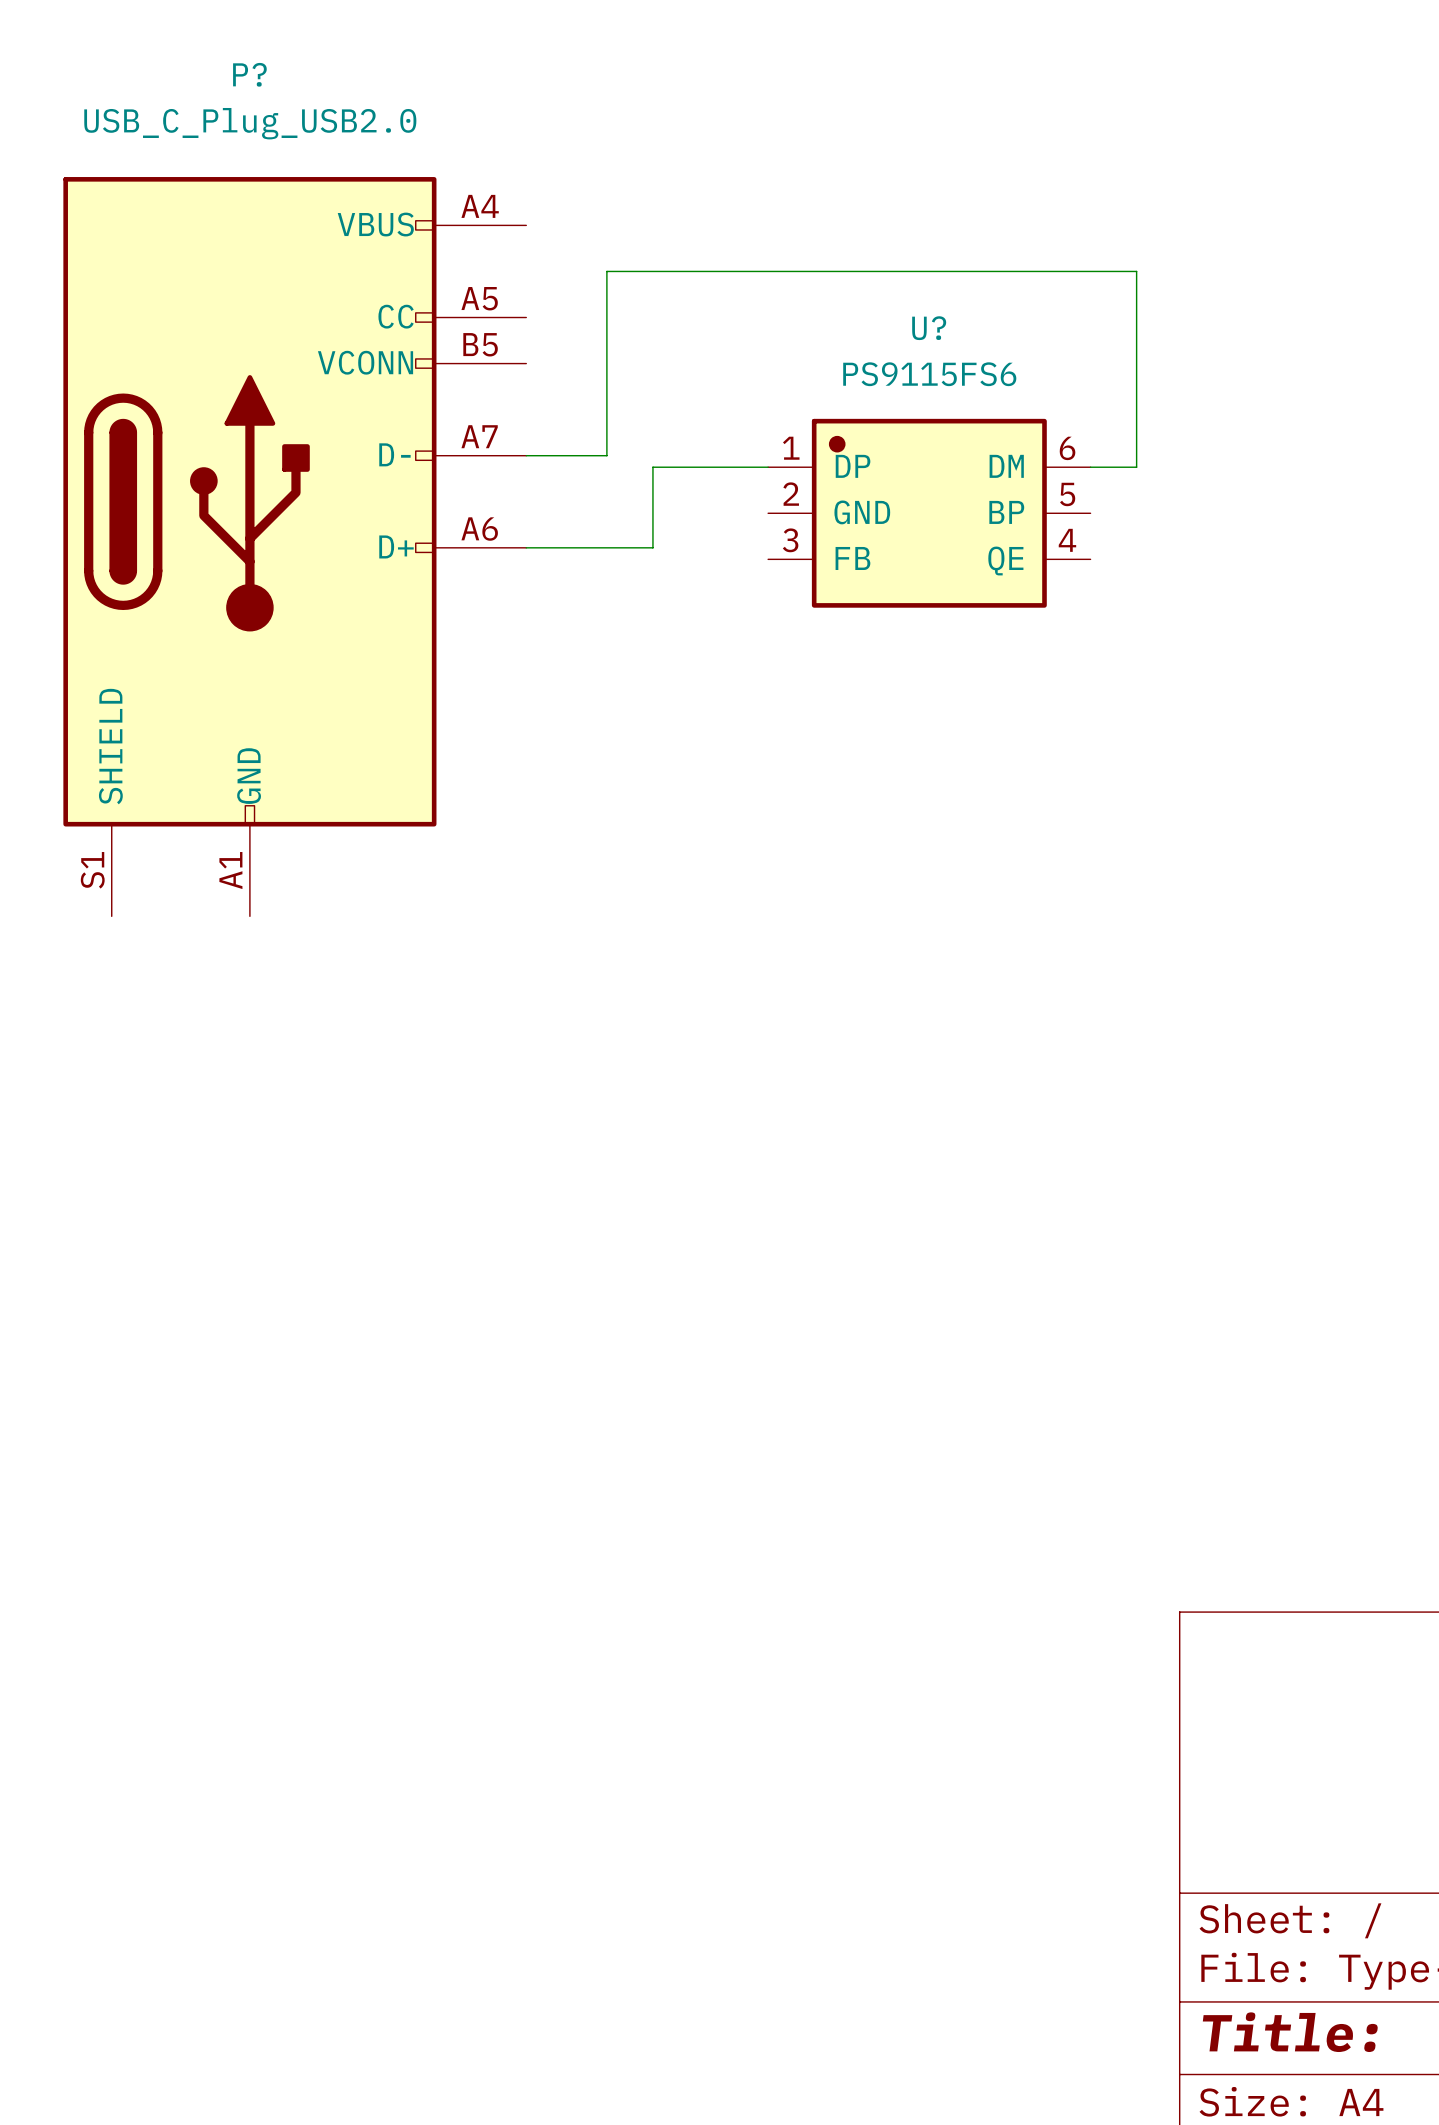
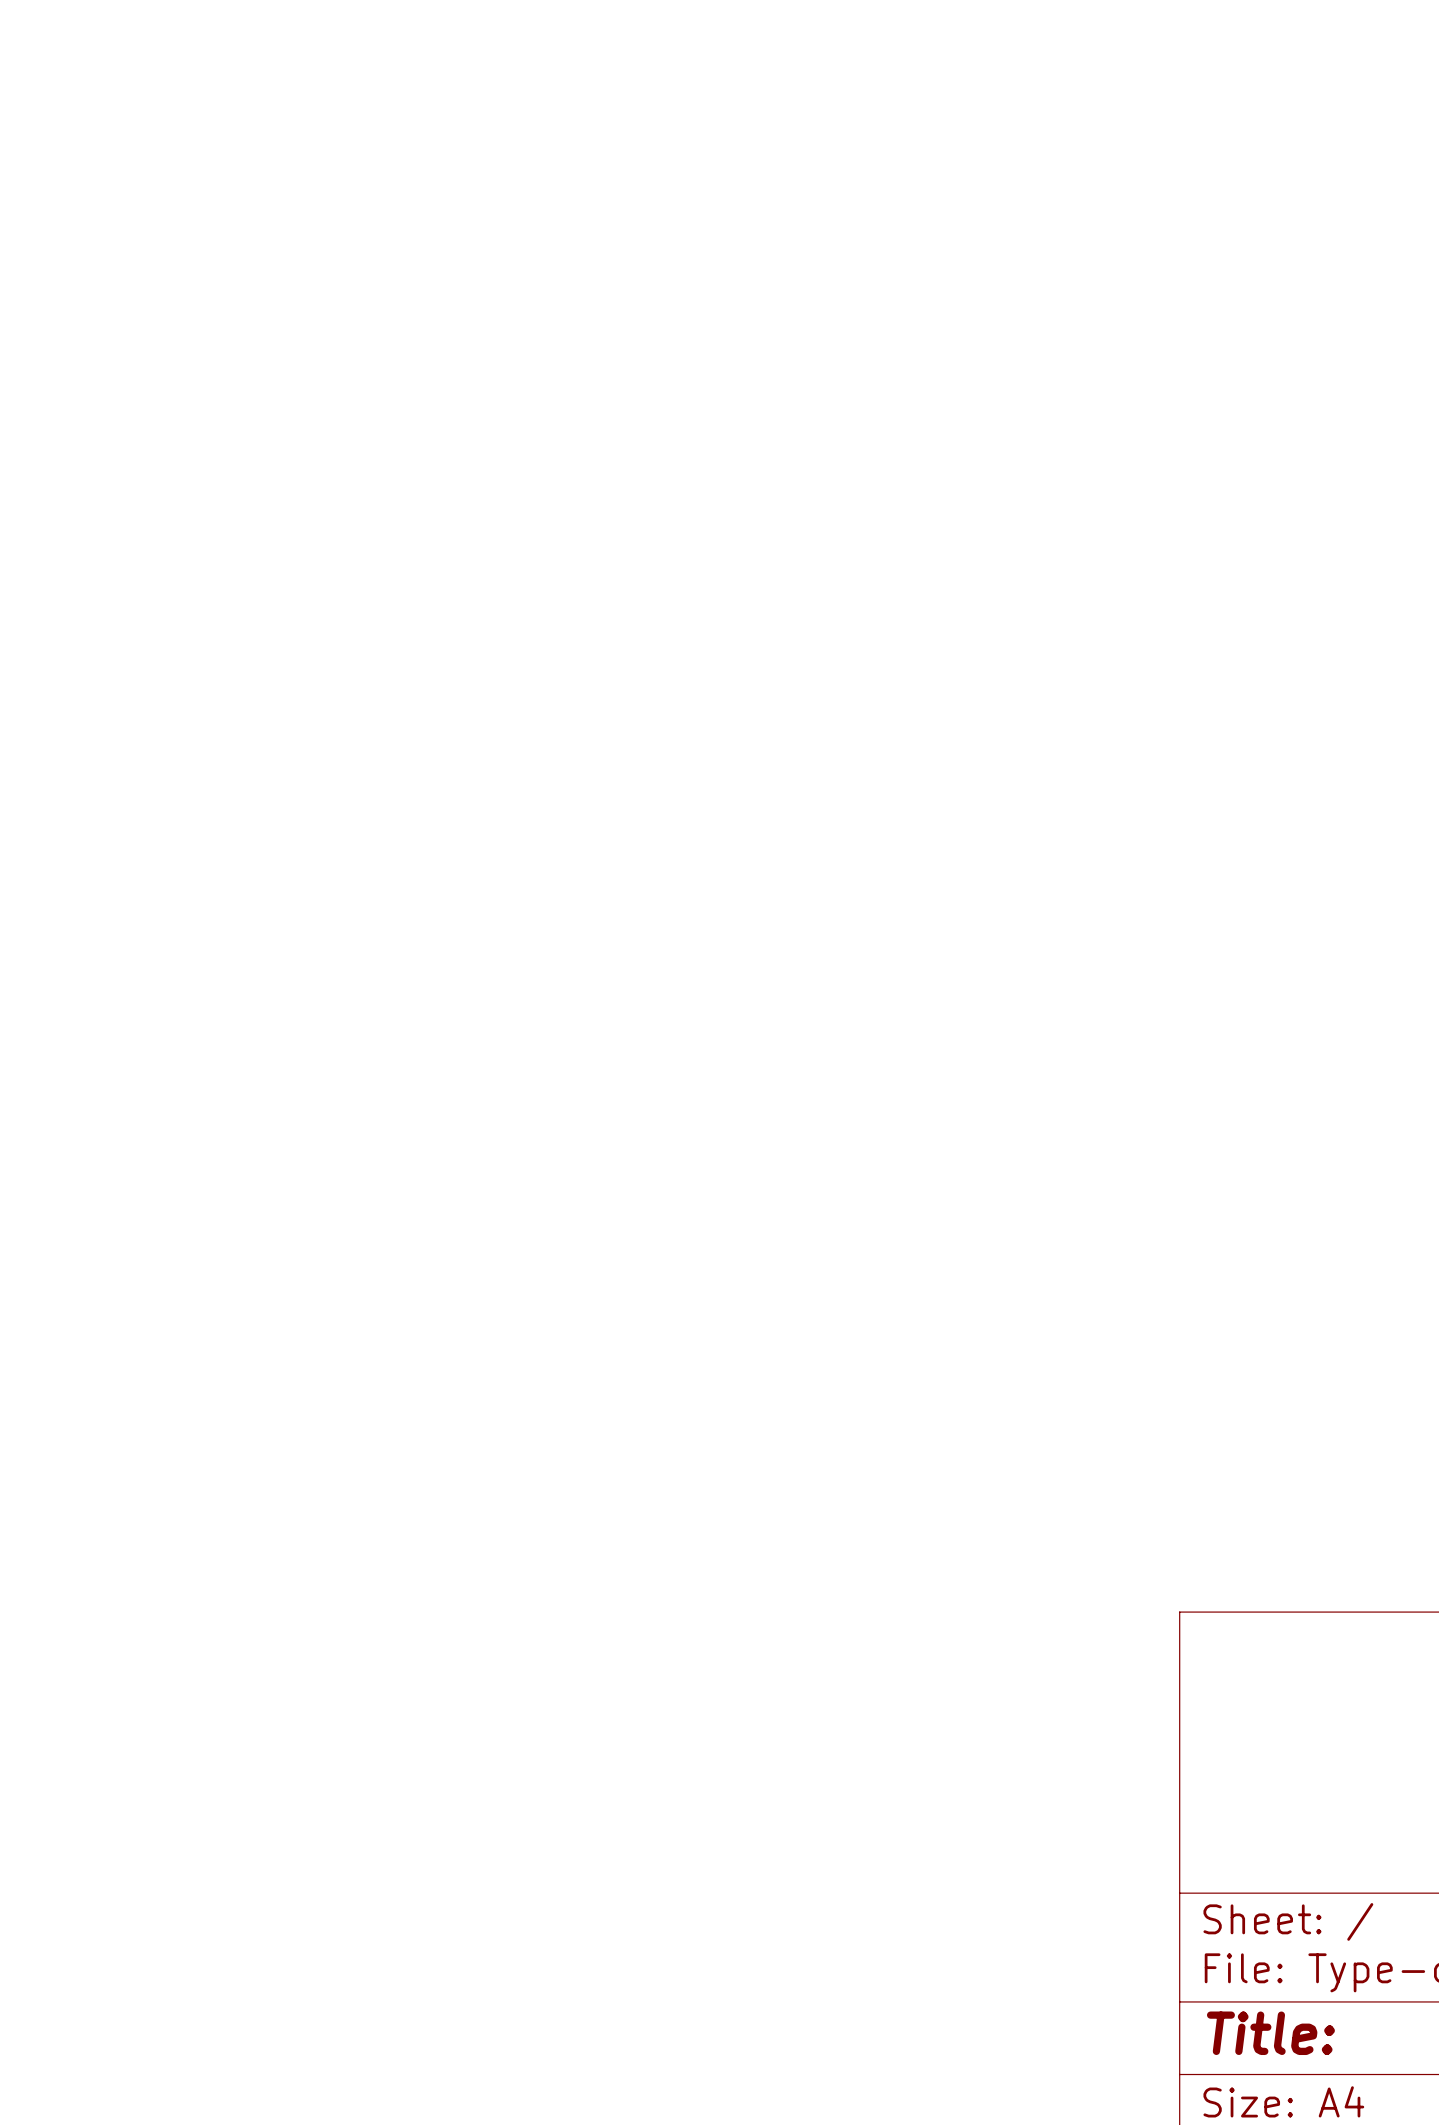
wire: (526, 455) (606, 455) (606, 271) (1136, 271) (1136, 467) (1090, 467) -> none
wire: (768, 467) (652, 467) (652, 547) (526, 547) -> none
U?: PS9115FS6 (929, 513) -> none
P?: USB_C_Plug_USB2.0 (294, 546) -> none

